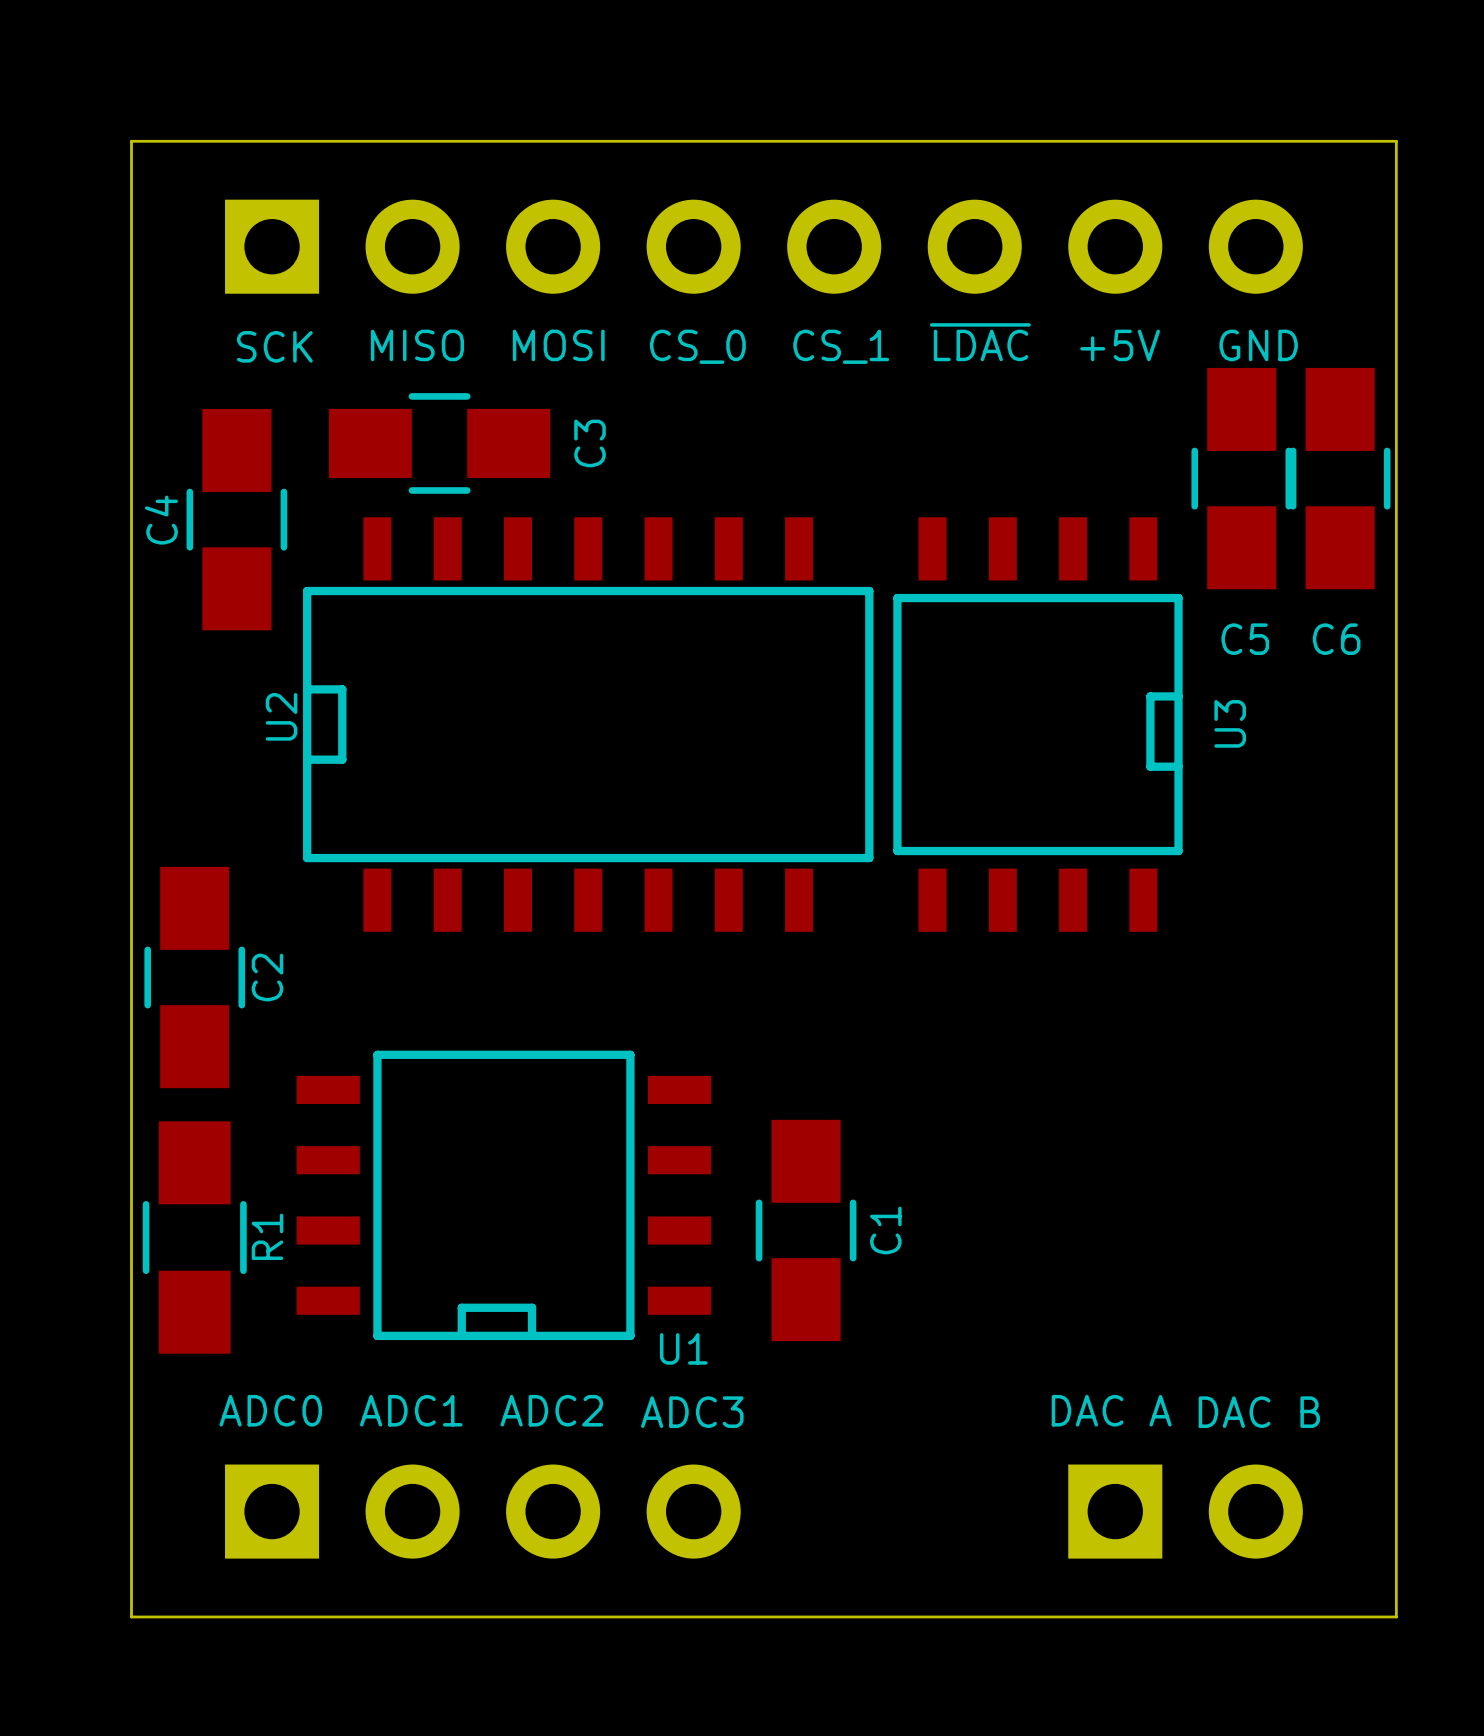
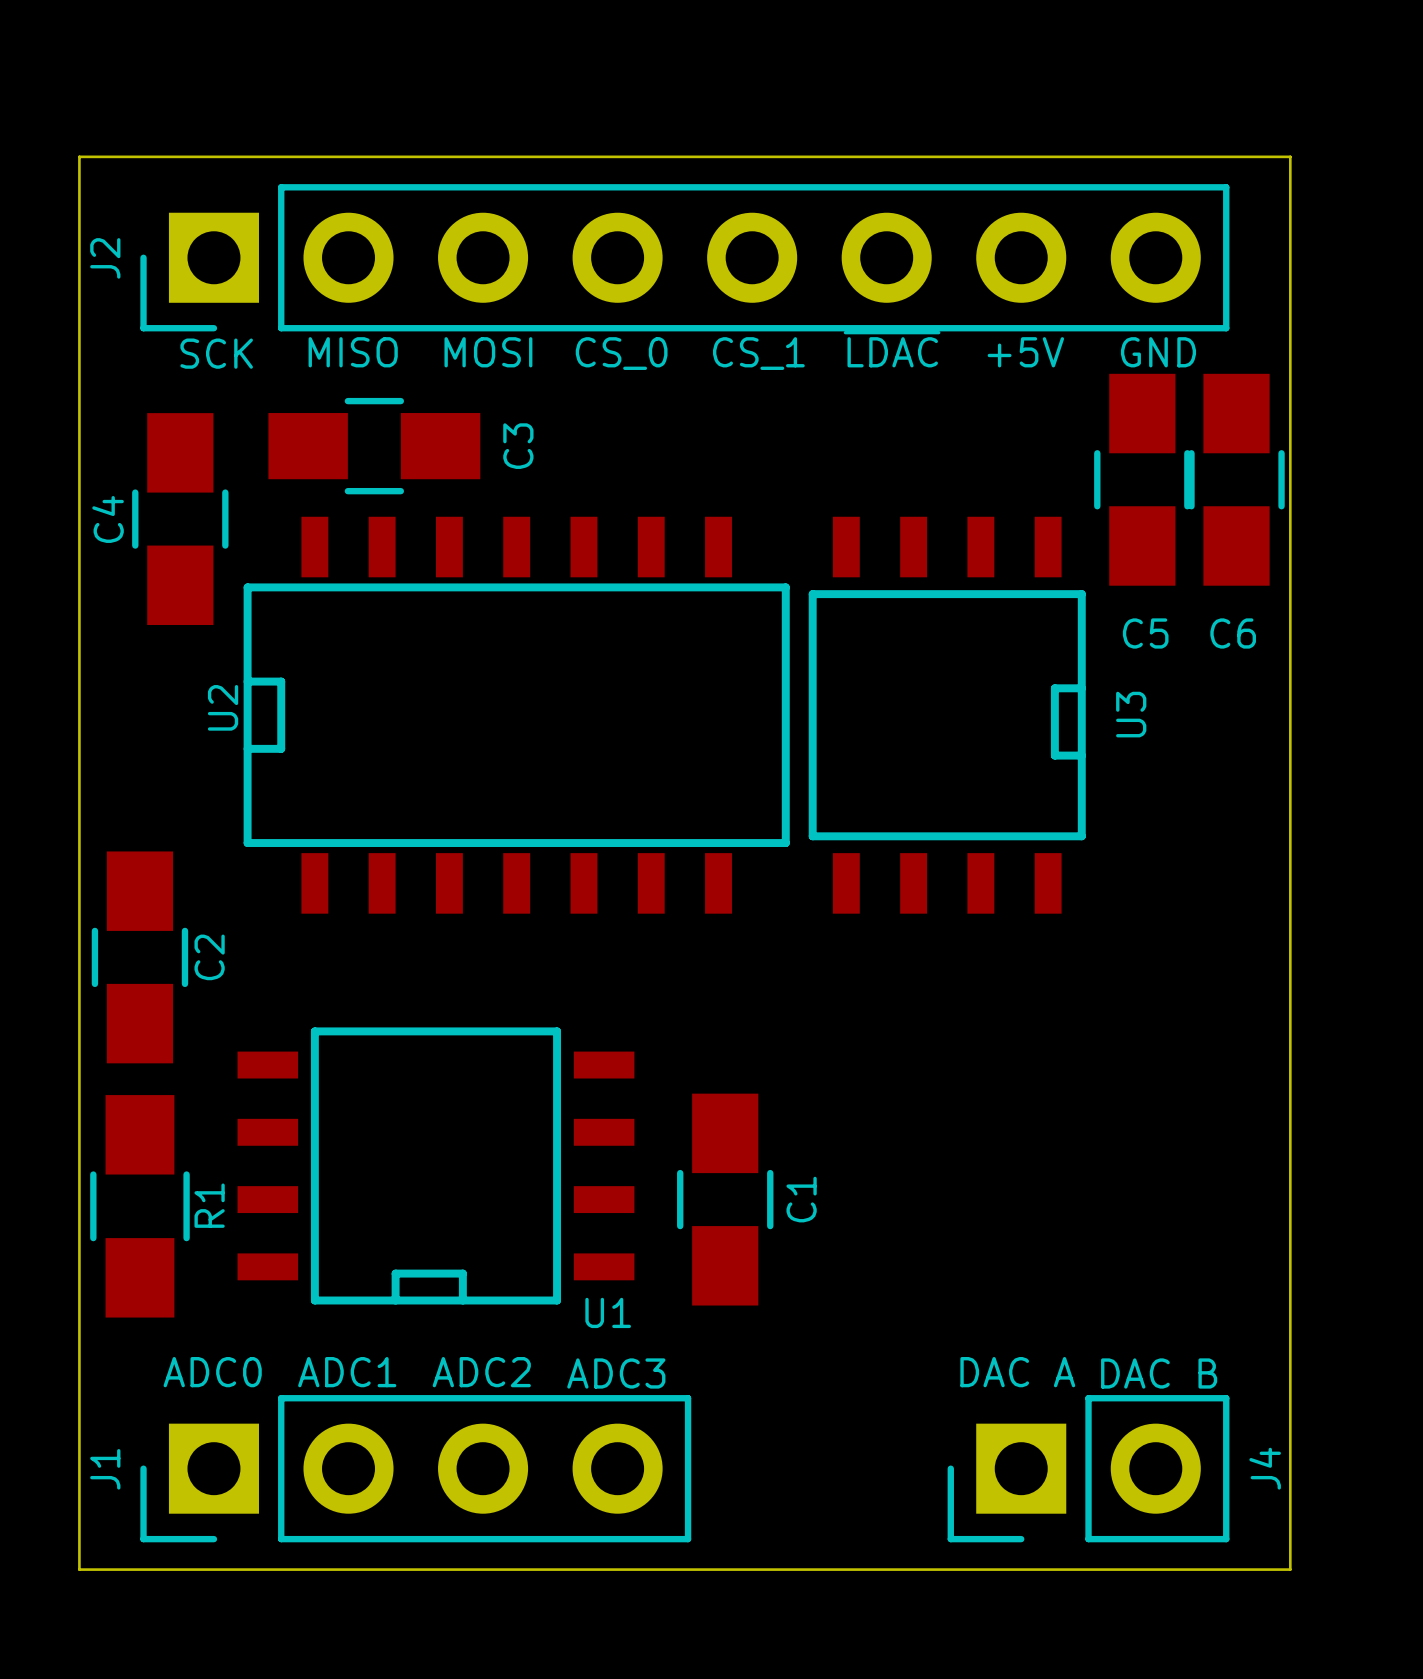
J2 side: bottom (763, 246) -> top (684, 257)
J1 side: bottom (482, 1511) -> top (415, 1468)
J4 side: bottom (1185, 1511) -> top (1088, 1468)

